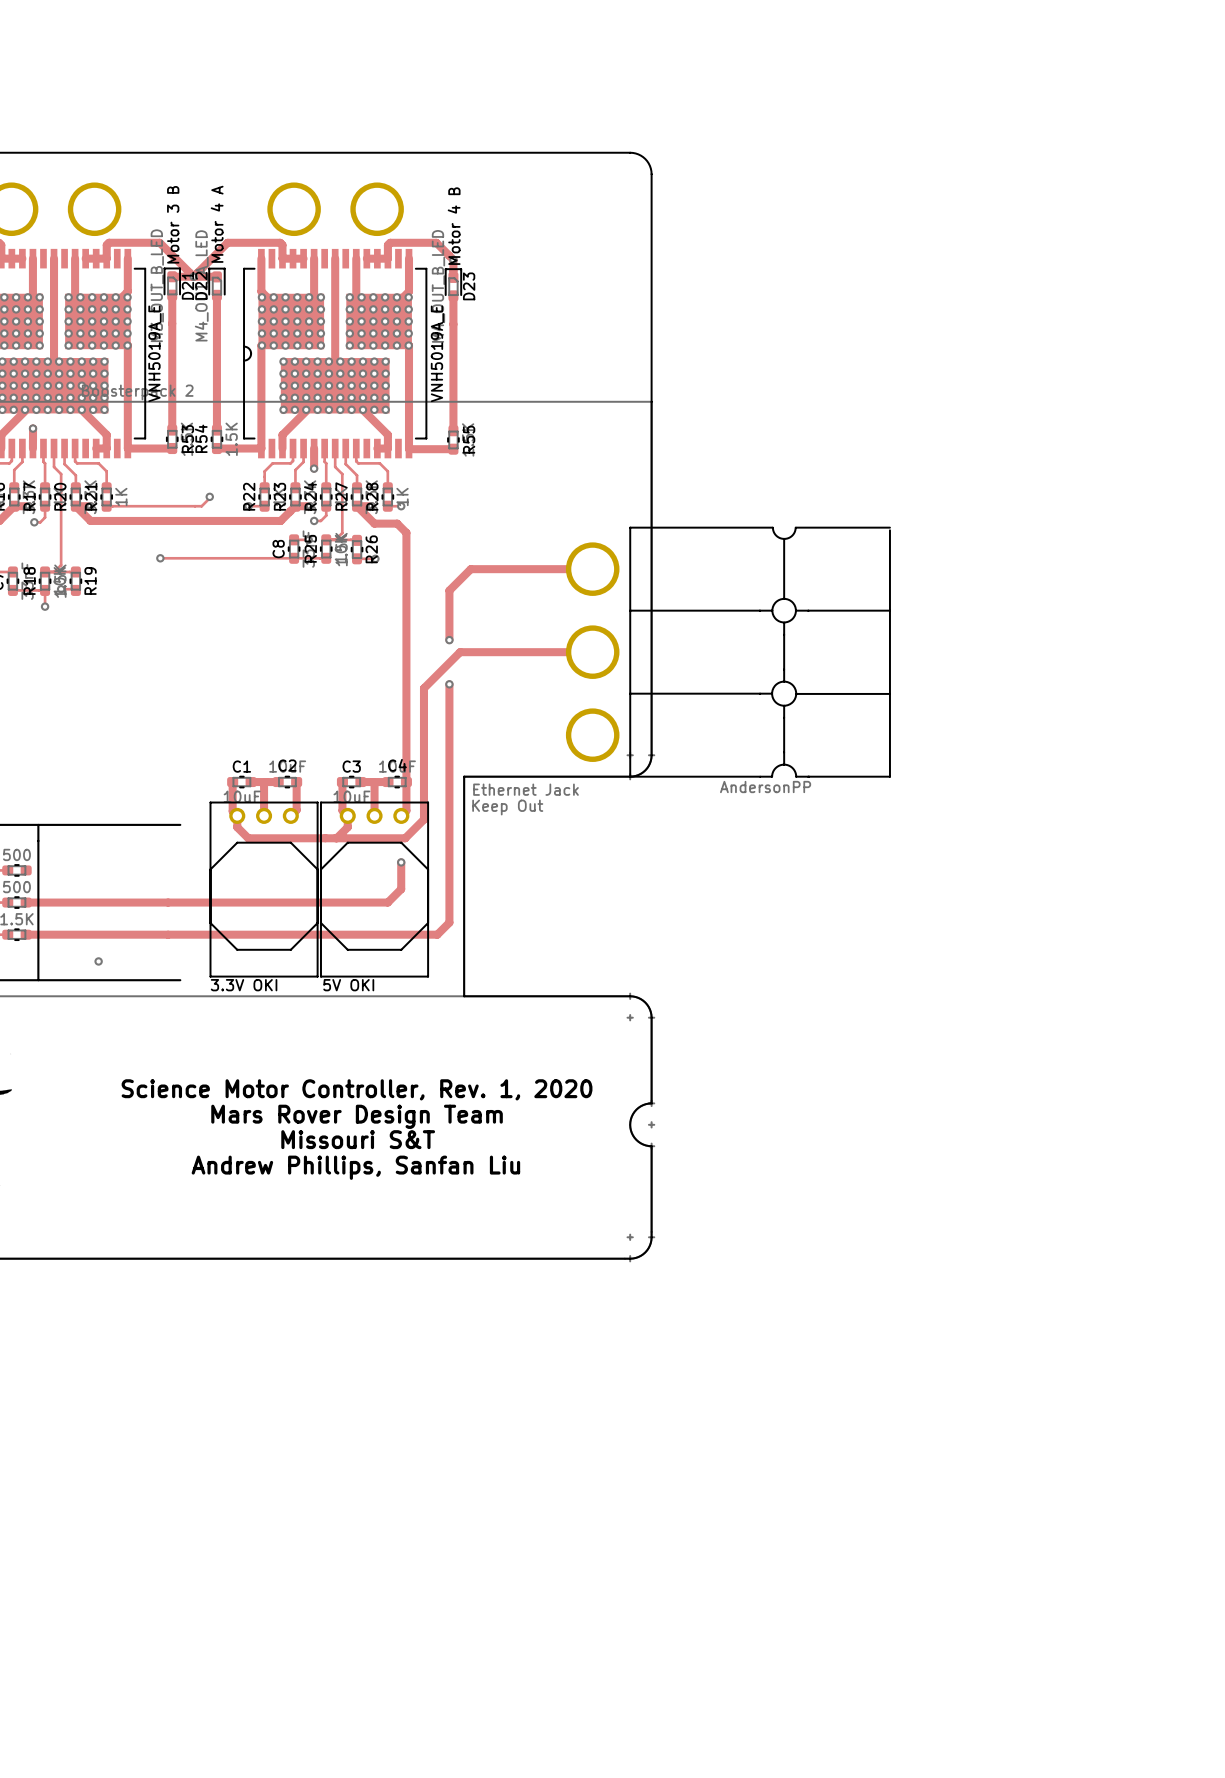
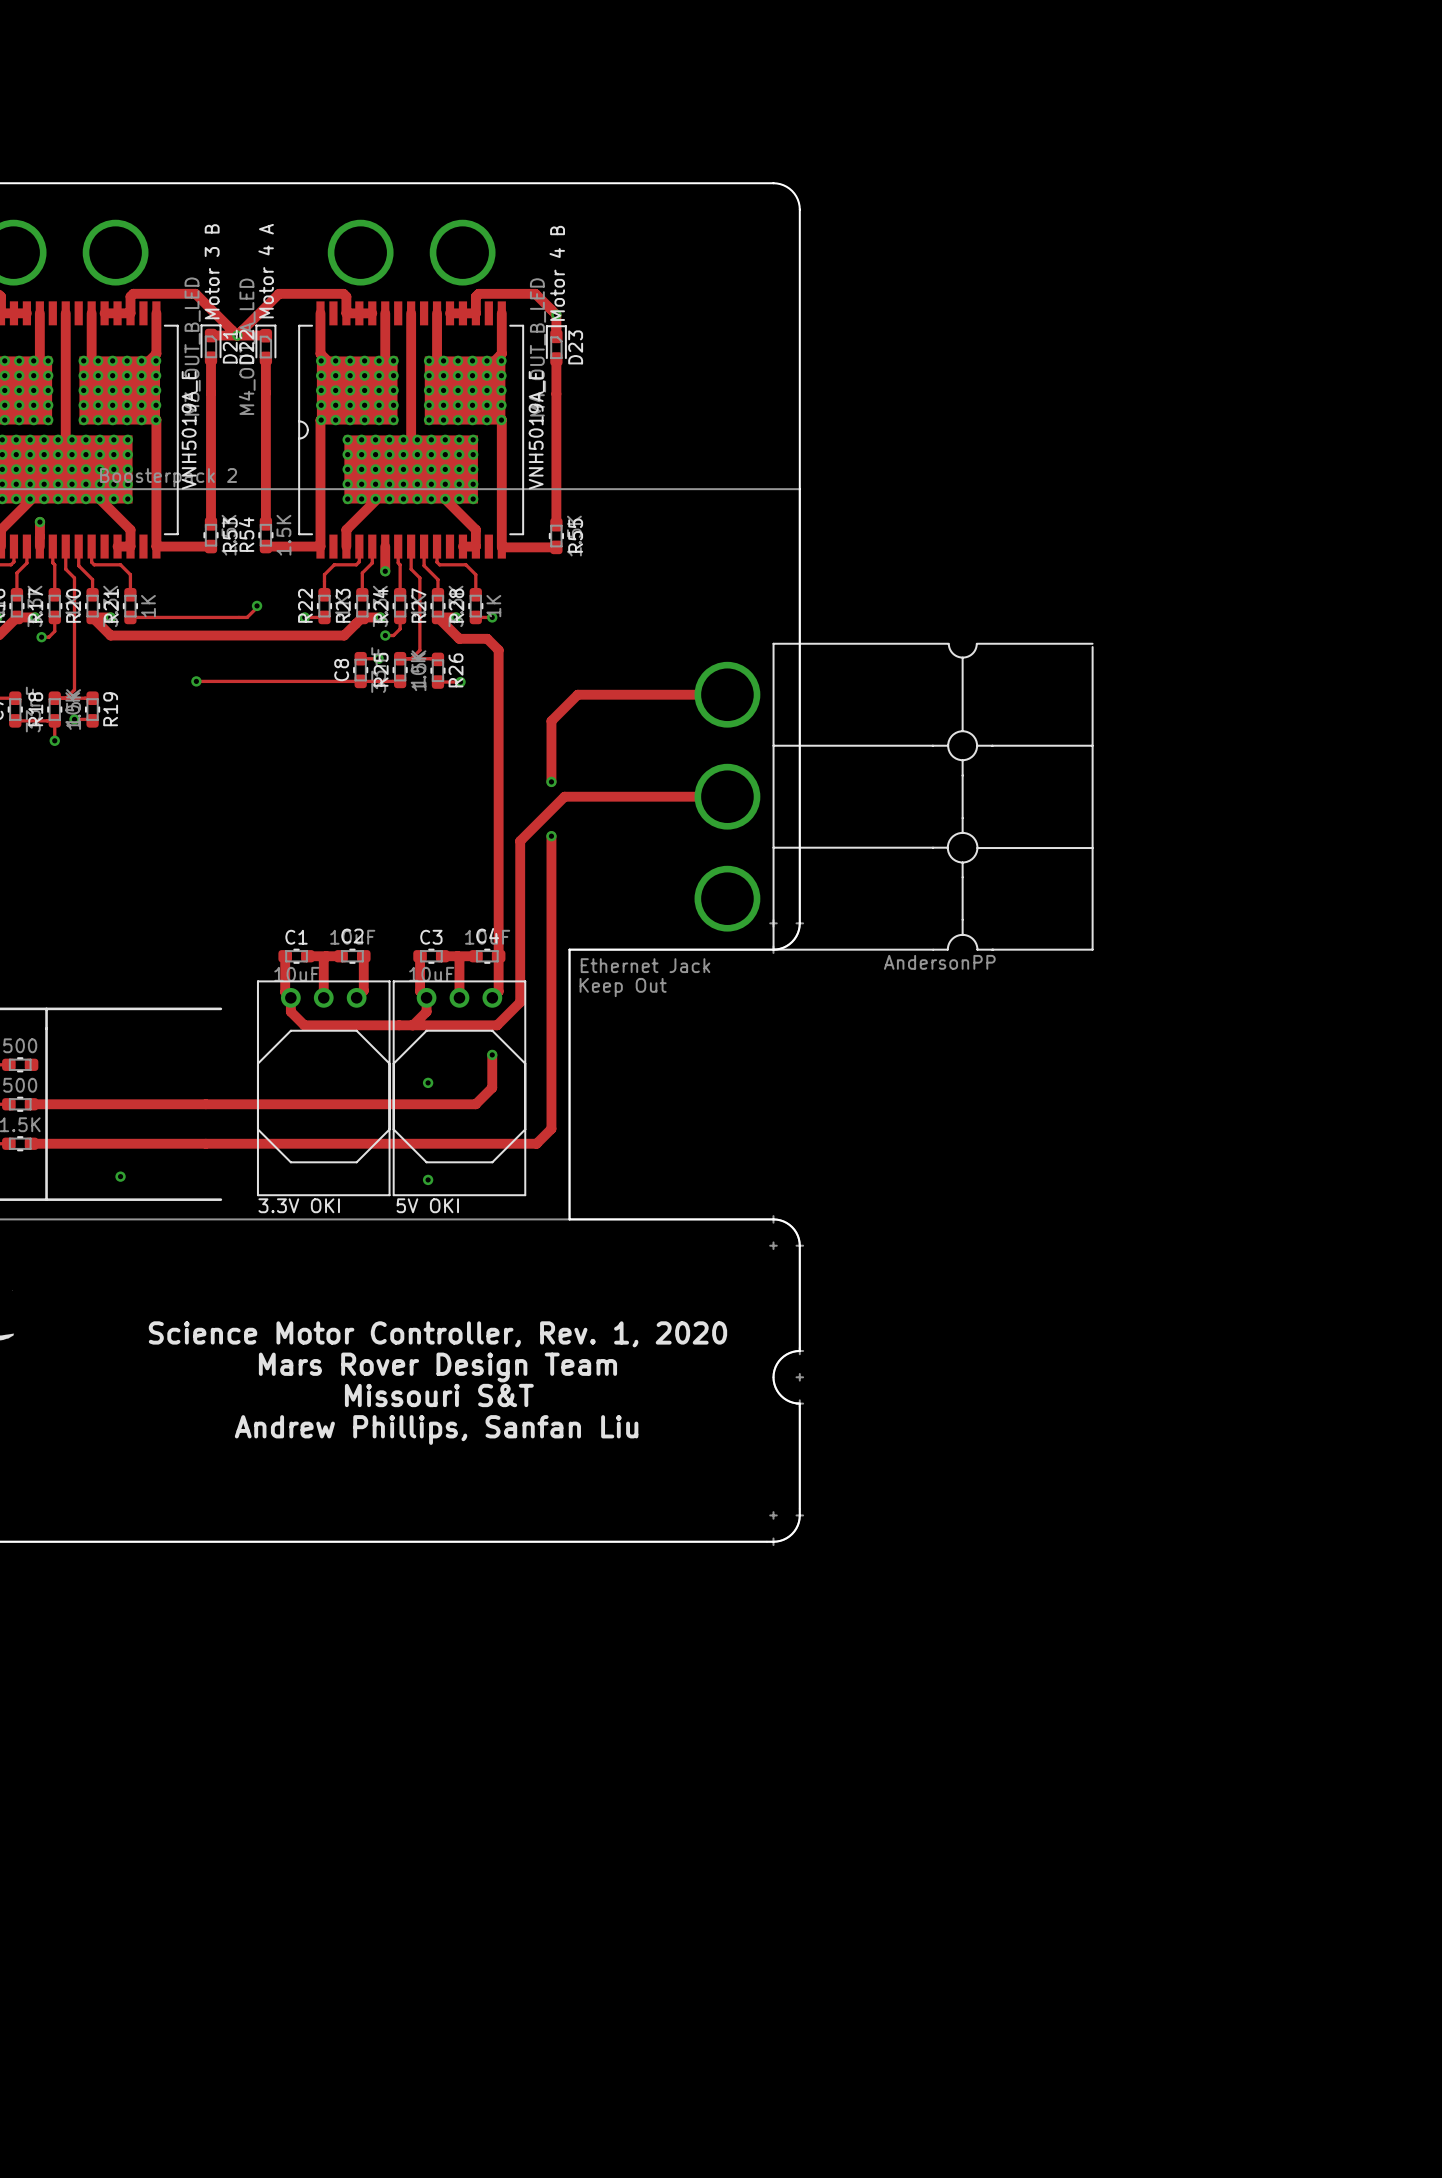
via: none -> (428, 1082)
via: none -> (428, 1179)

